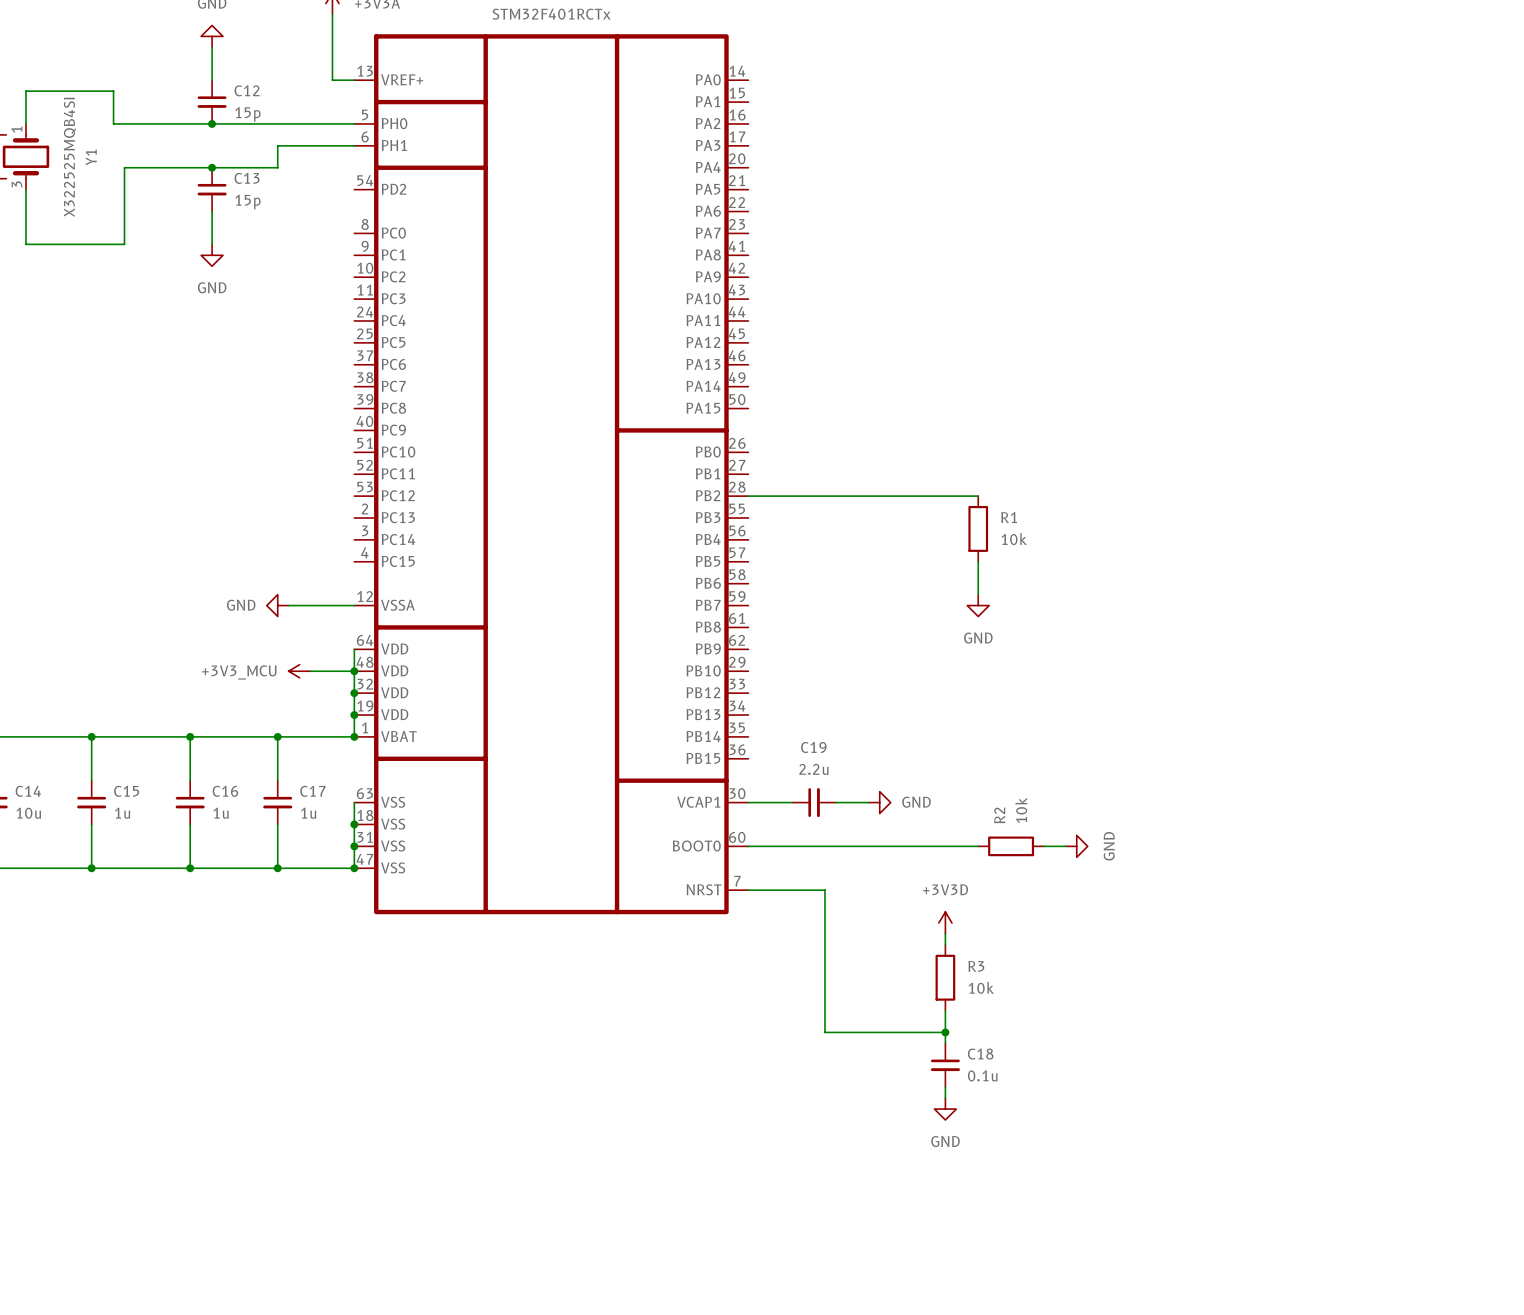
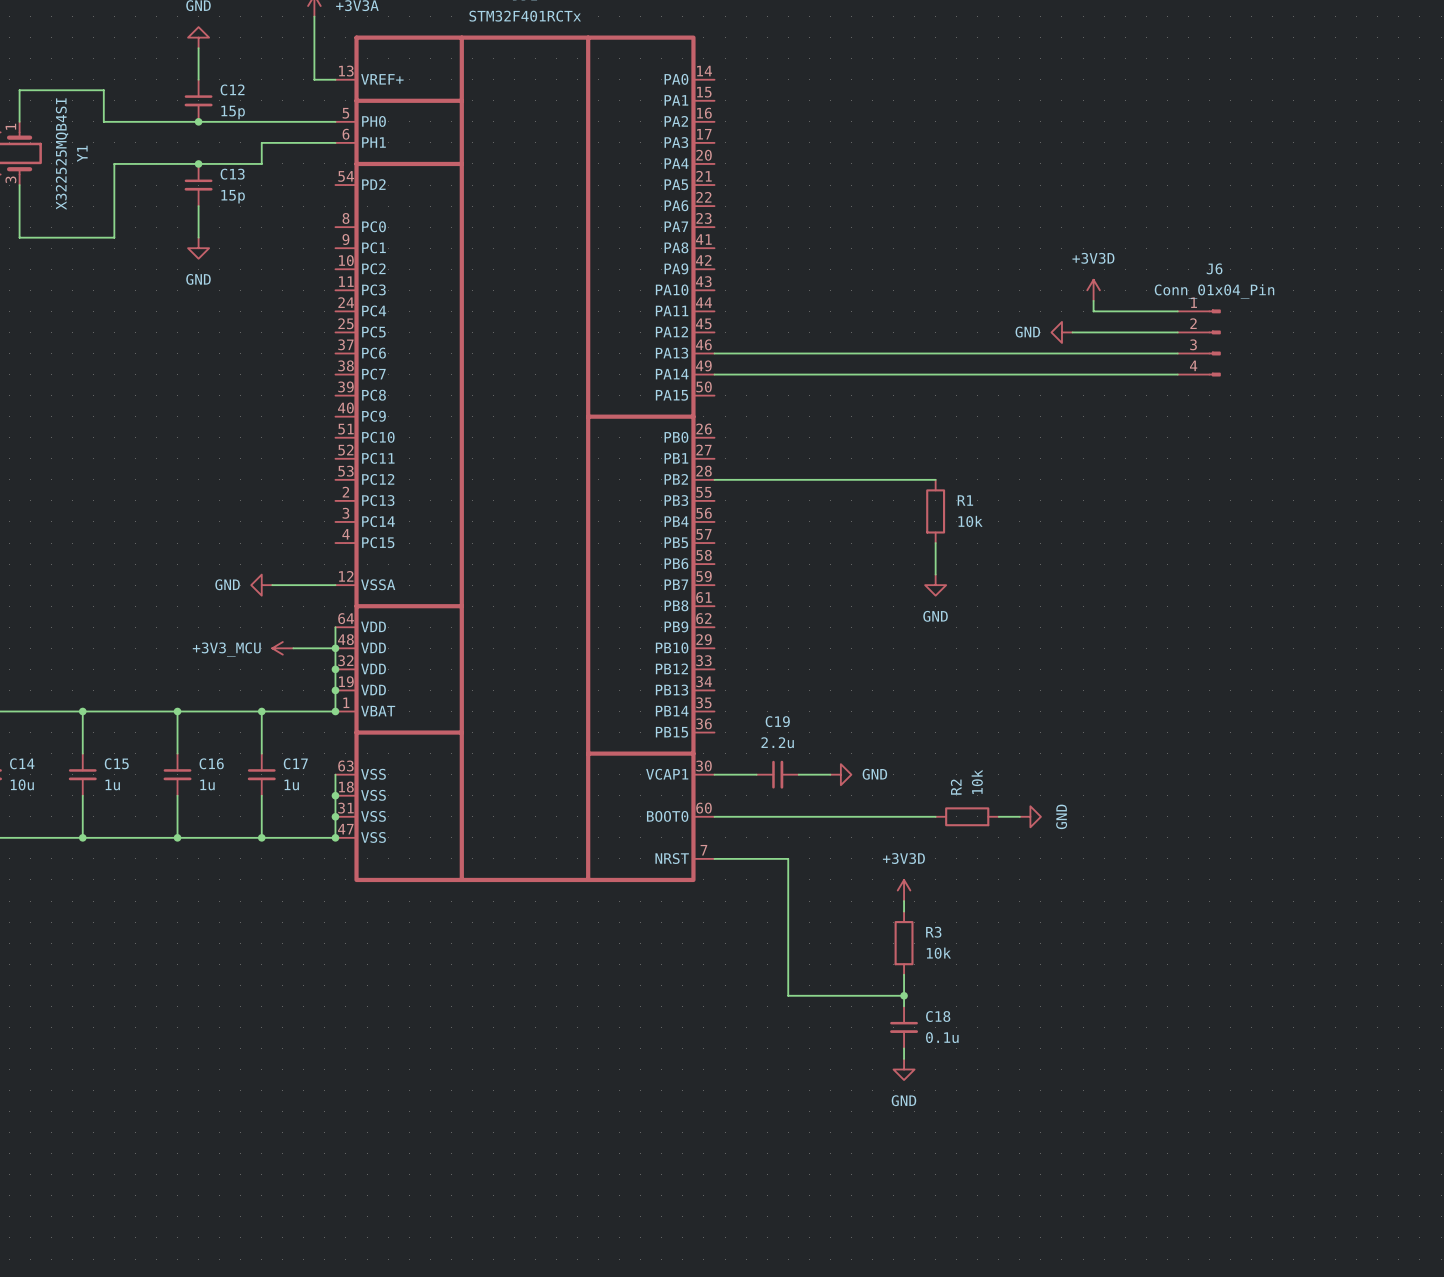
power symbol: none -> +3V3D (1093, 290)
wire: none -> (1093, 300) (1093, 311) (1177, 311)
power symbol: none -> GND (1061, 332)
wire: none -> (1072, 332) (1177, 332)
J6: none -> Conn_01x04_Pin (1199, 342)
wire: none -> (714, 353) (1177, 353)
wire: none -> (714, 374) (1177, 374)

